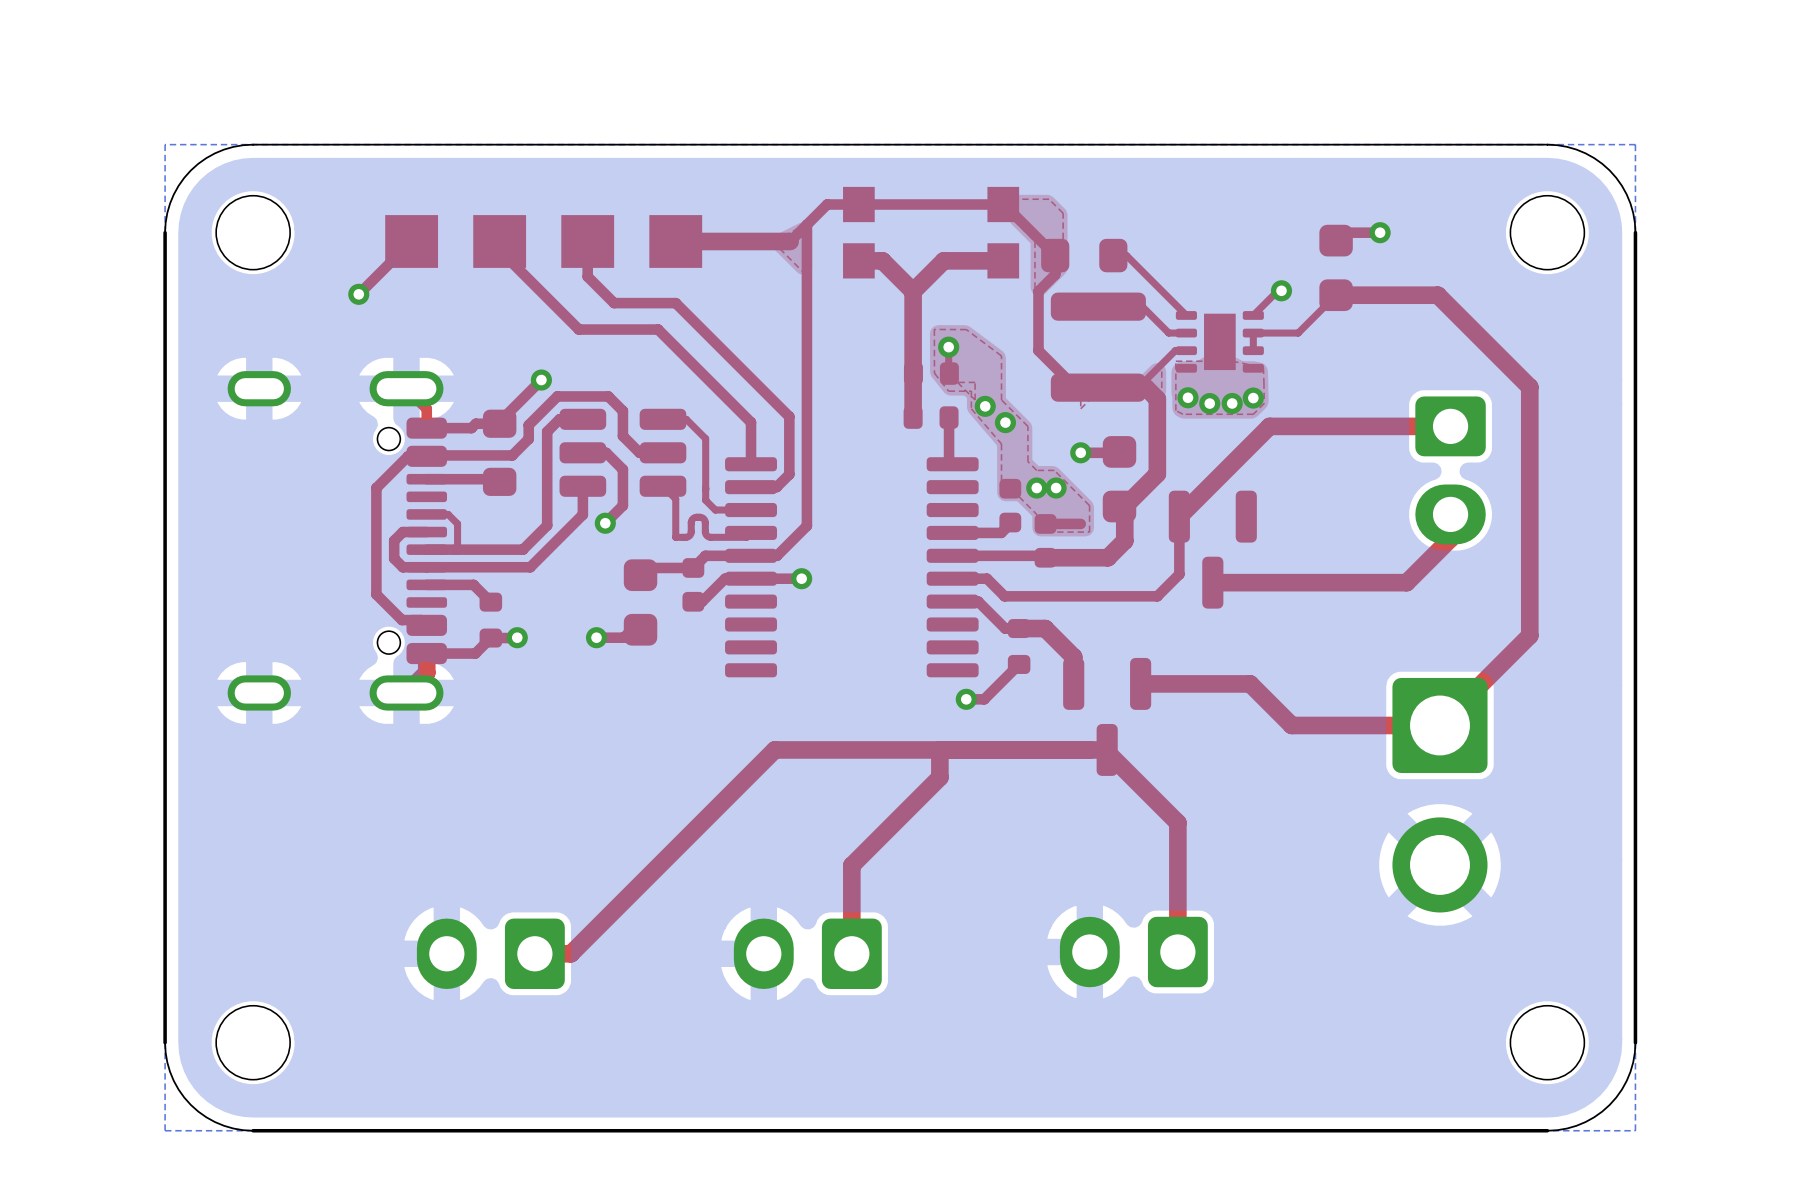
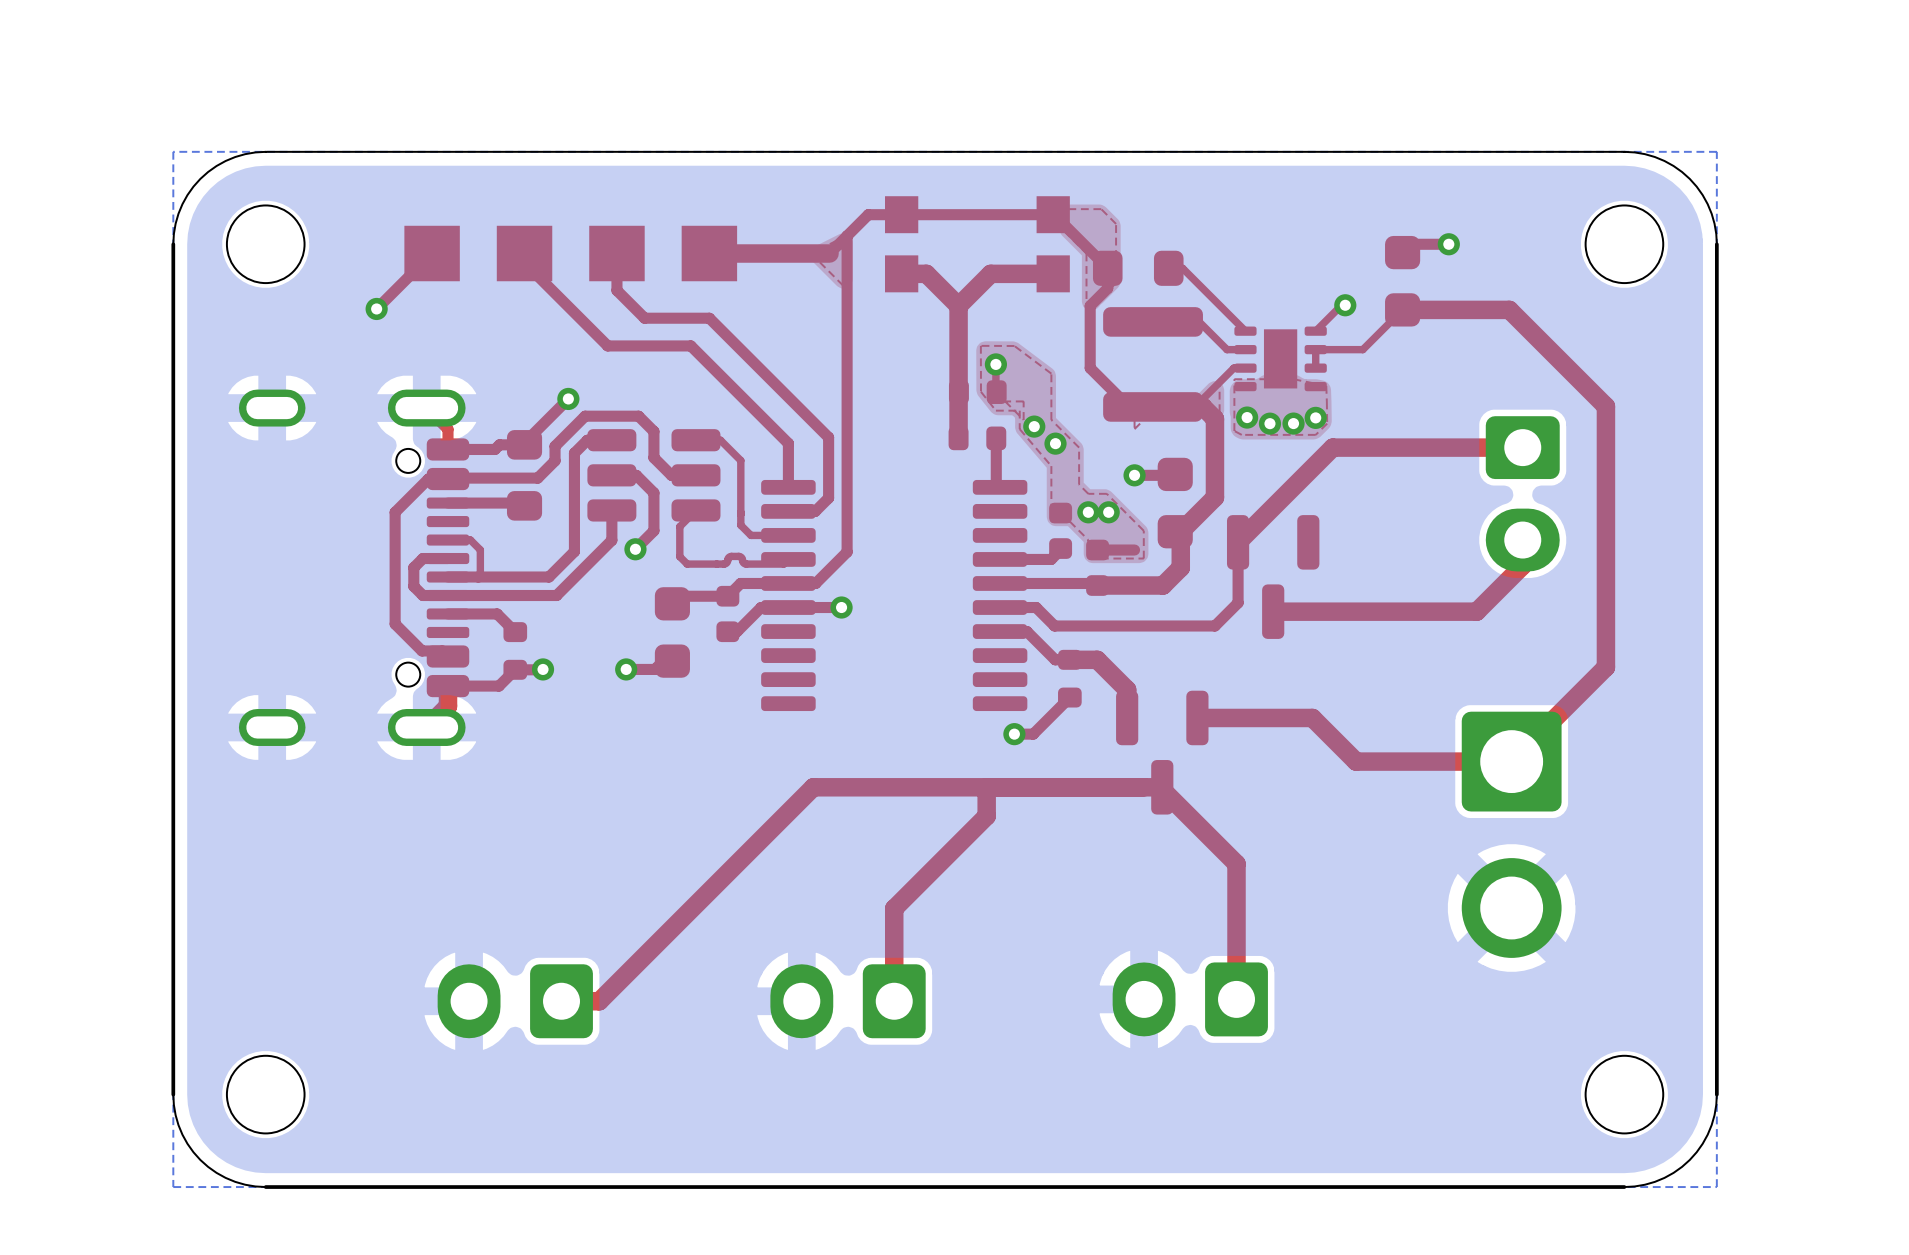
top track: (662, 486) (675, 499) (675, 537) -> (695, 510) (679, 526) (679, 556) (687, 564) (709, 564)
top track: (710, 537) (706, 534) (704, 520) (699, 517) (692, 519) (690, 533) (685, 537) -> (746, 564) (738, 556) (730, 556) (725, 563) (719, 564)

